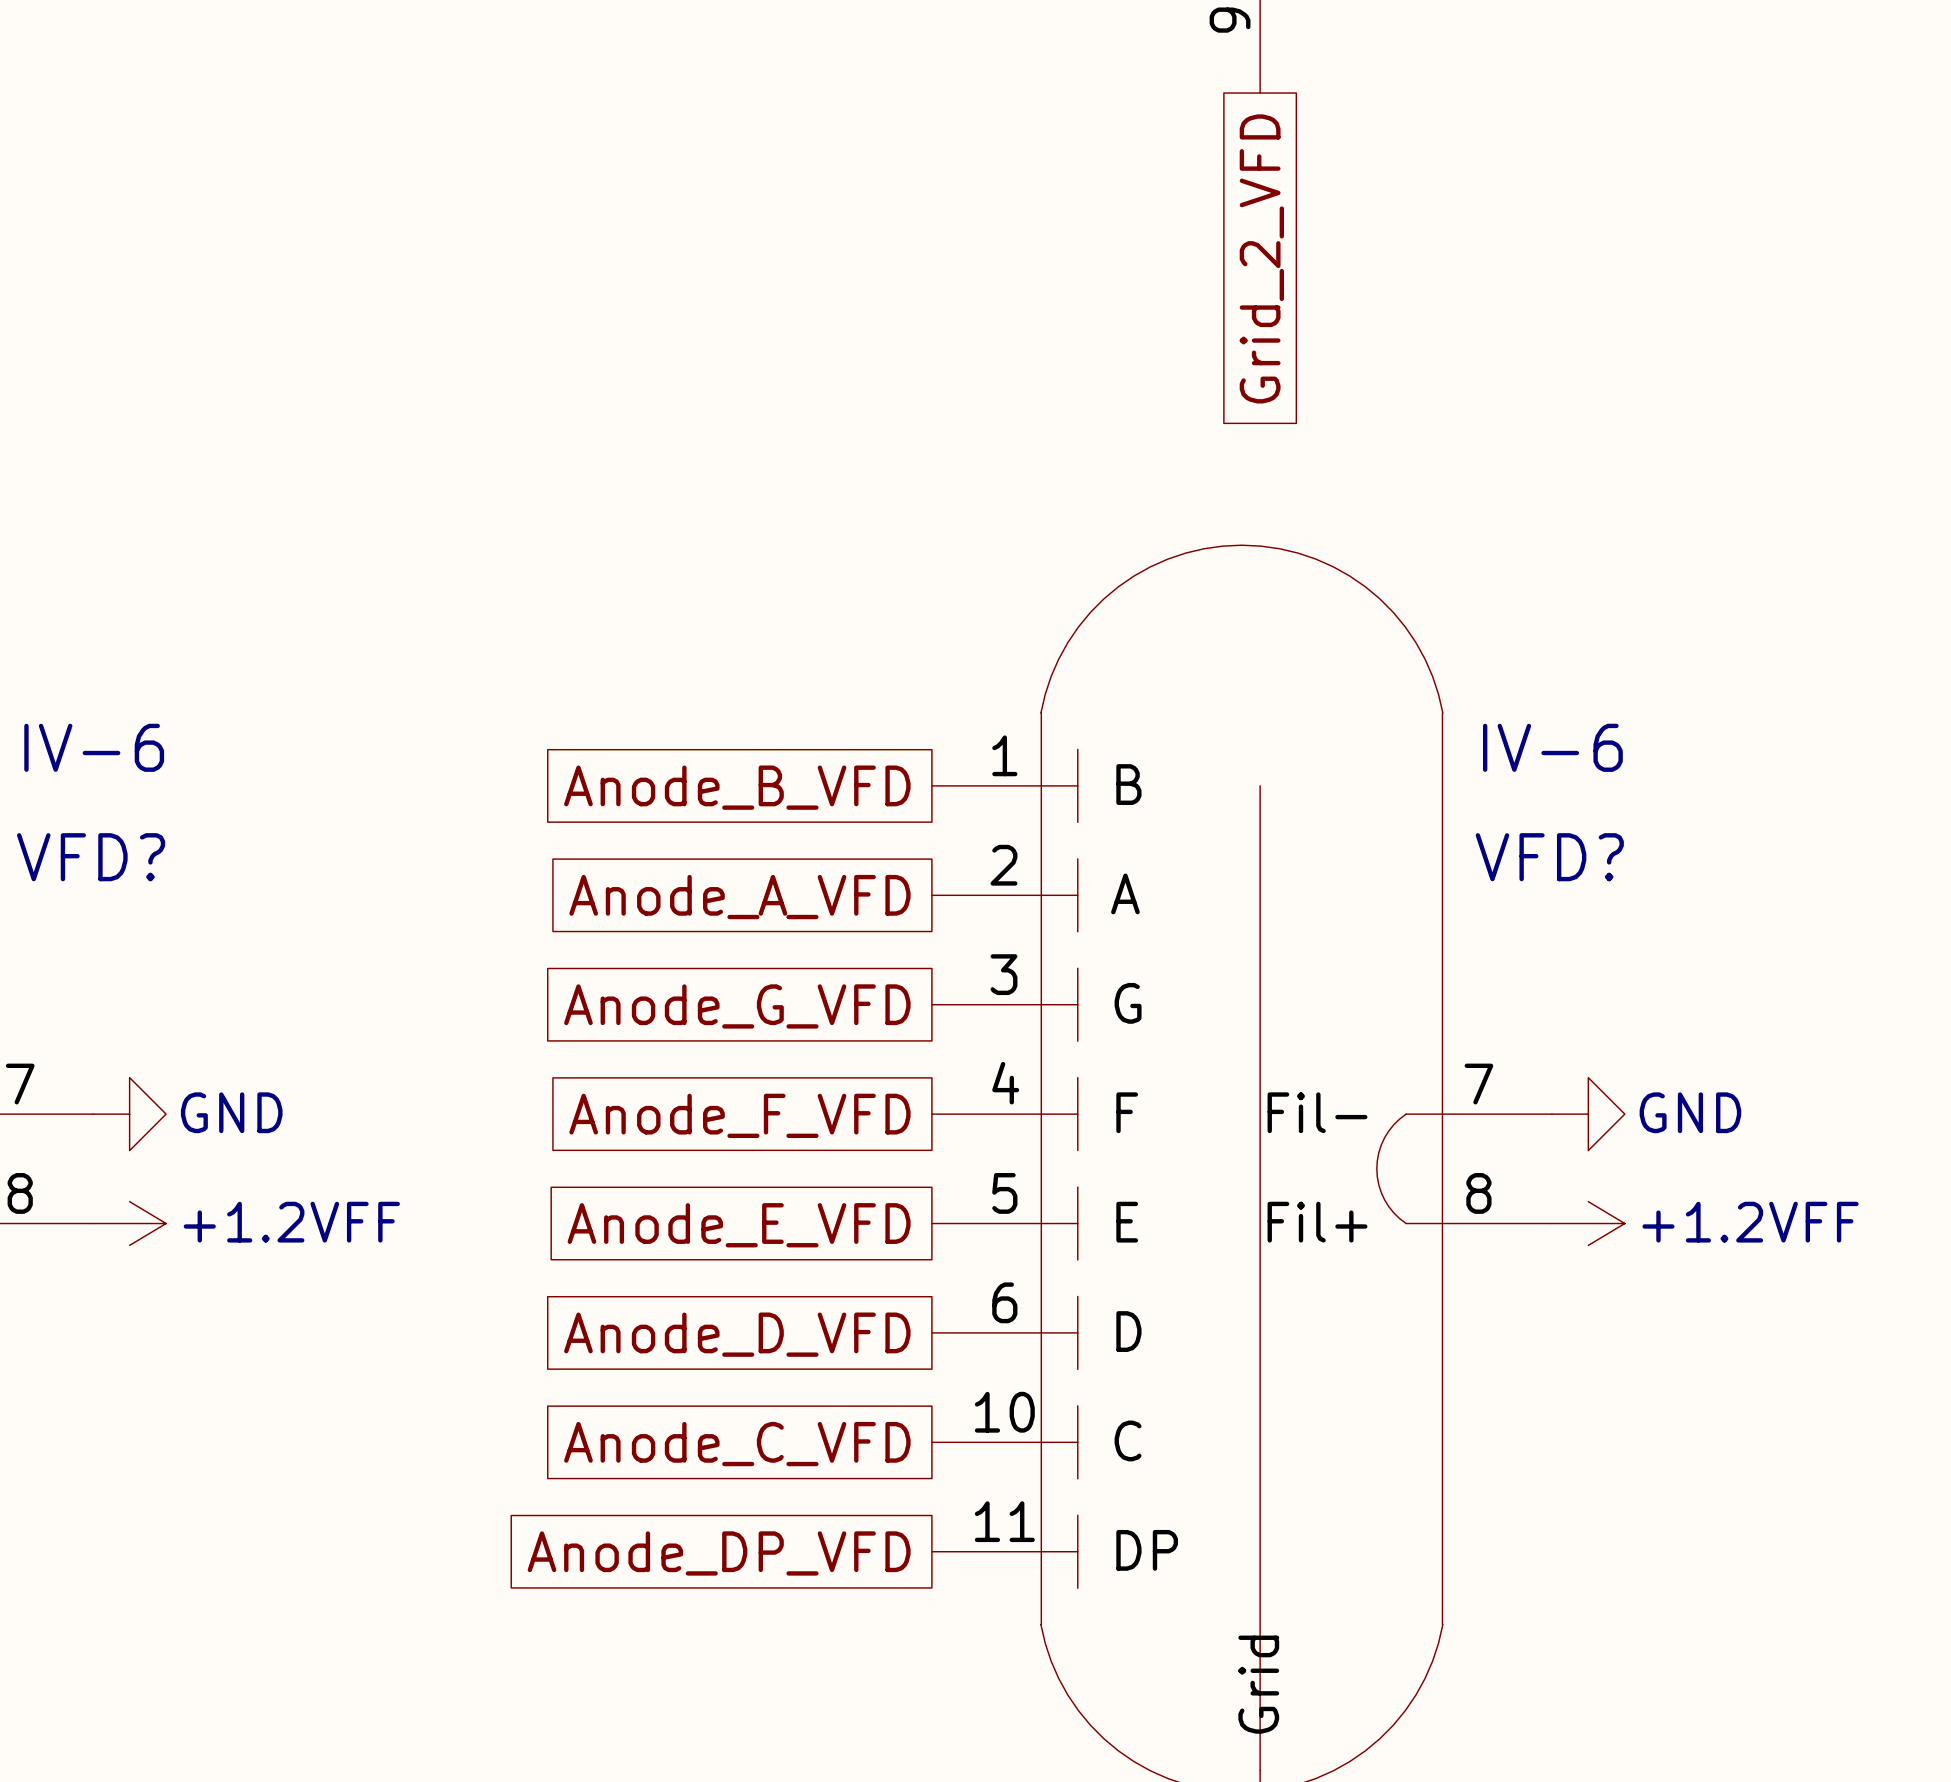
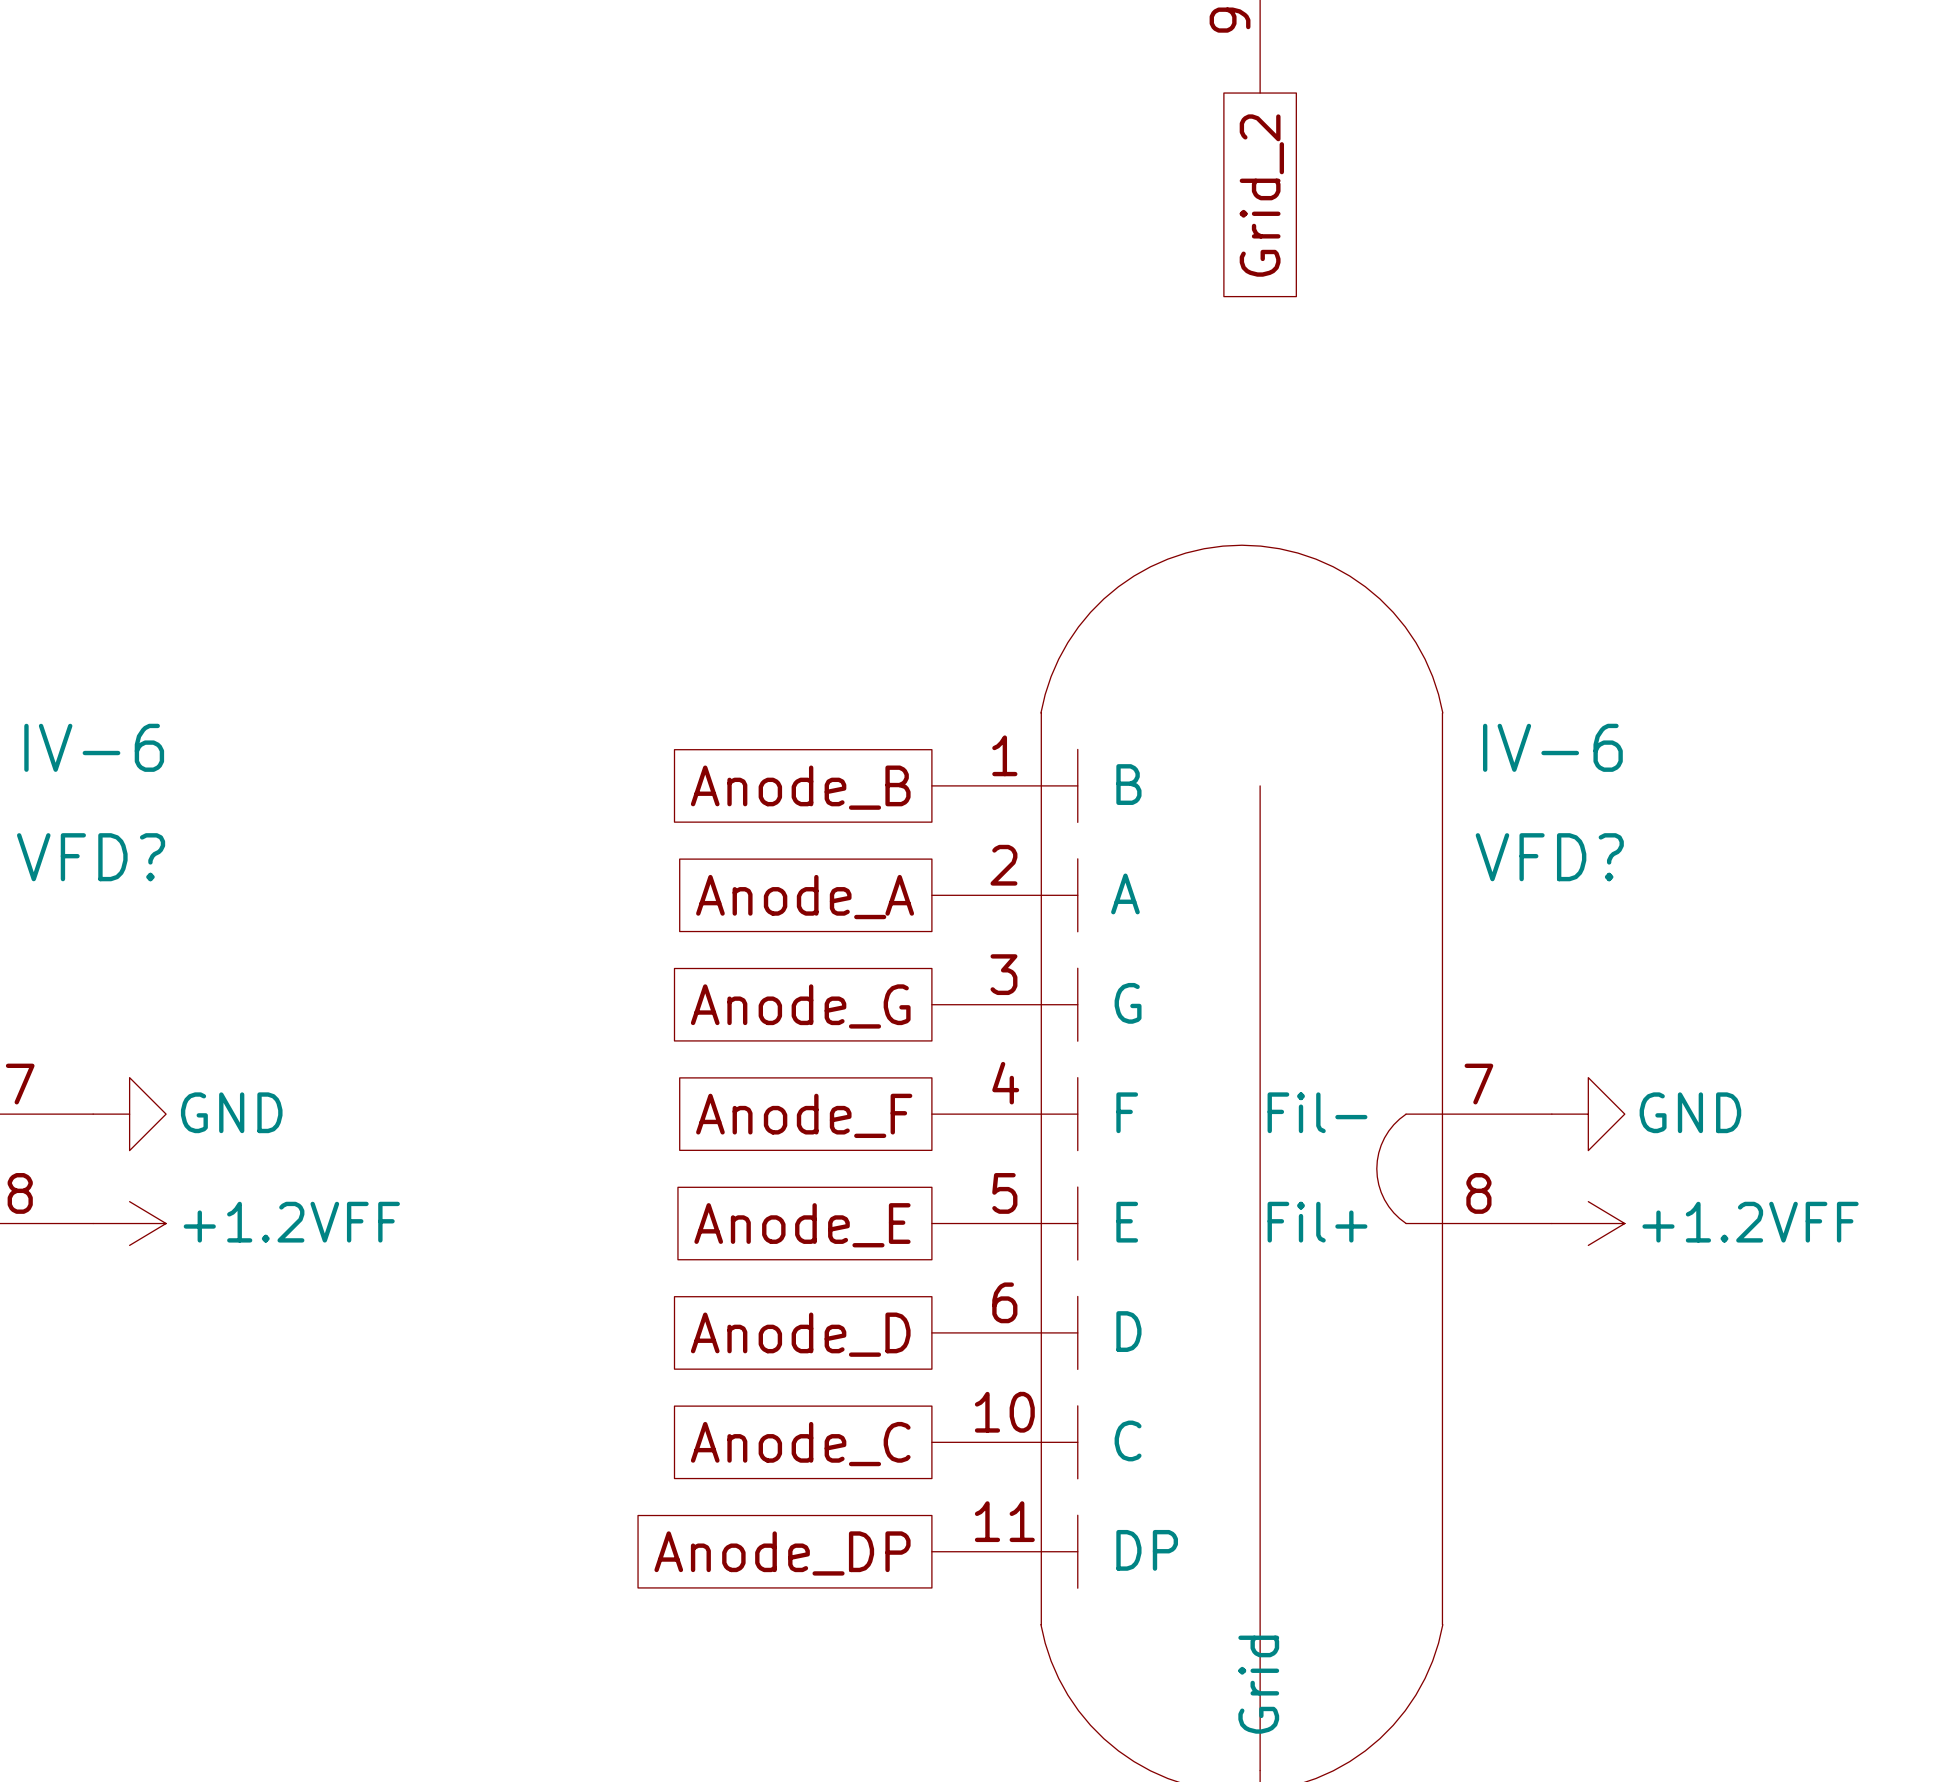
global label: Grid_2_VFD (1261, 258) -> Grid_2 (1261, 195)
global label: Anode_B_VFD (737, 787) -> Anode_B (800, 787)
global label: Anode_A_VFD (739, 897) -> Anode_A (805, 897)
global label: Anode_G_VFD (737, 1006) -> Anode_G (800, 1006)
global label: Anode_F_VFD (739, 1115) -> Anode_F (804, 1115)
global label: Anode_E_VFD (739, 1225) -> Anode_E (802, 1225)
global label: Anode_D_VFD (737, 1334) -> Anode_D (800, 1334)
global label: Anode_C_VFD (737, 1444) -> Anode_C (800, 1444)
global label: Anode_DP_VFD (719, 1553) -> Anode_DP (782, 1553)

